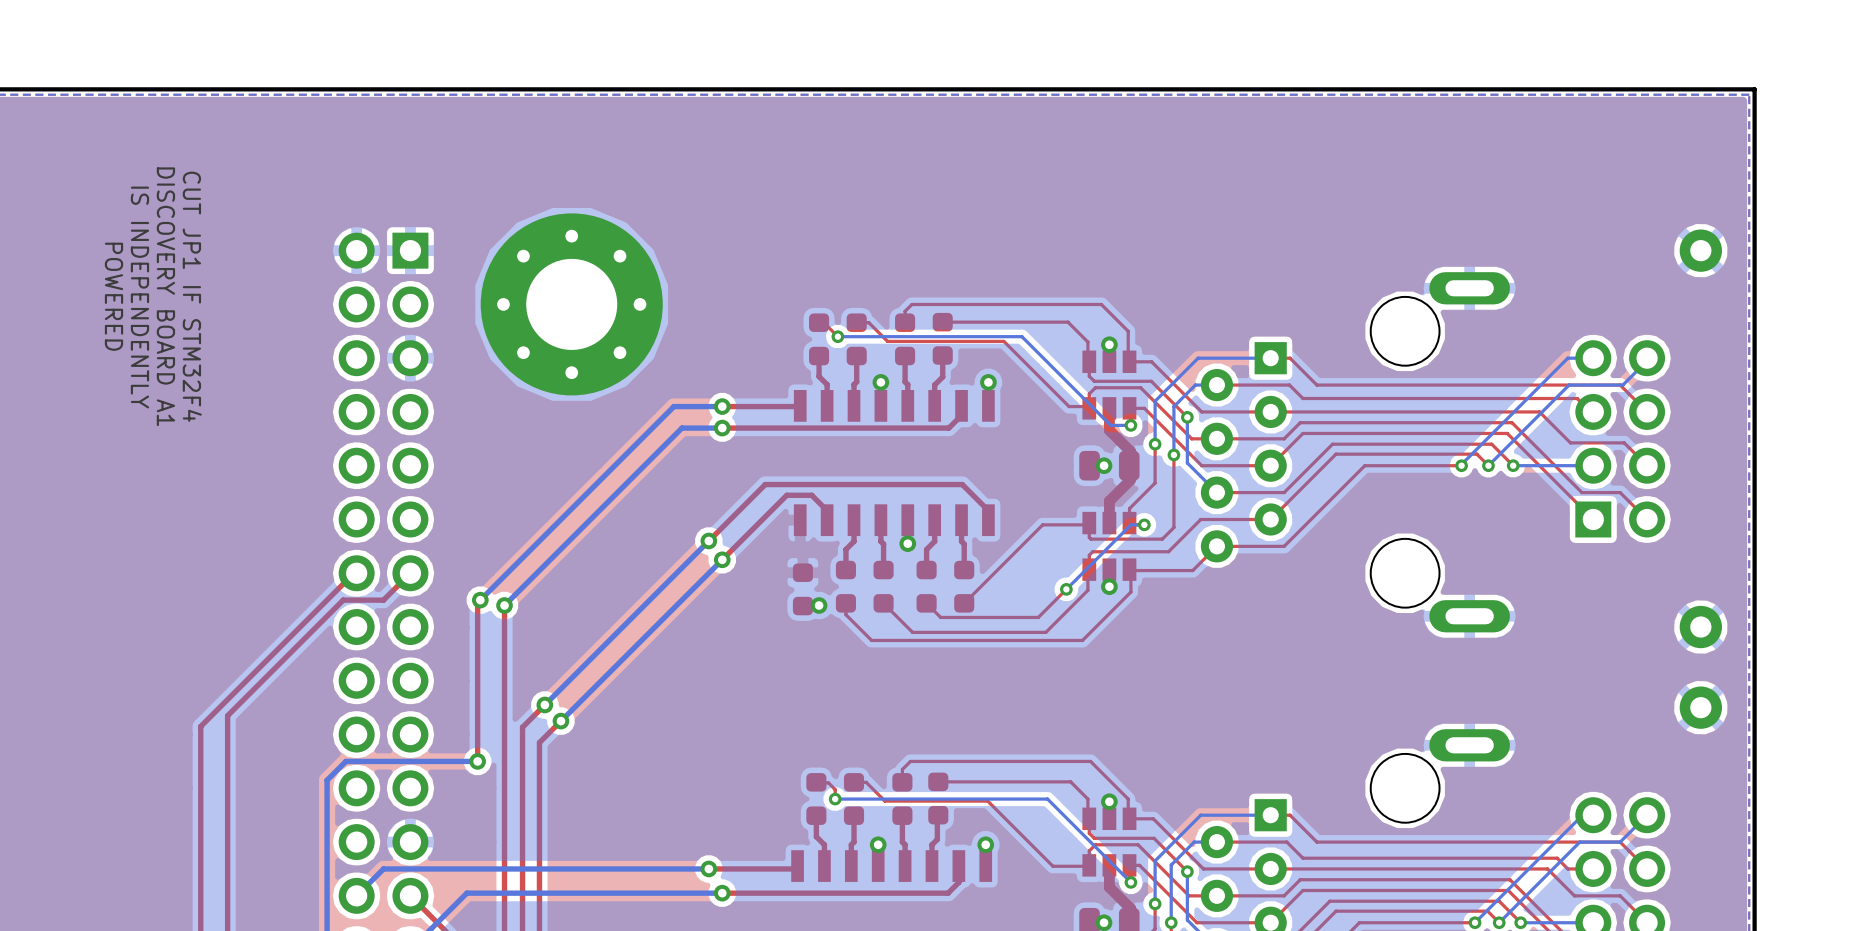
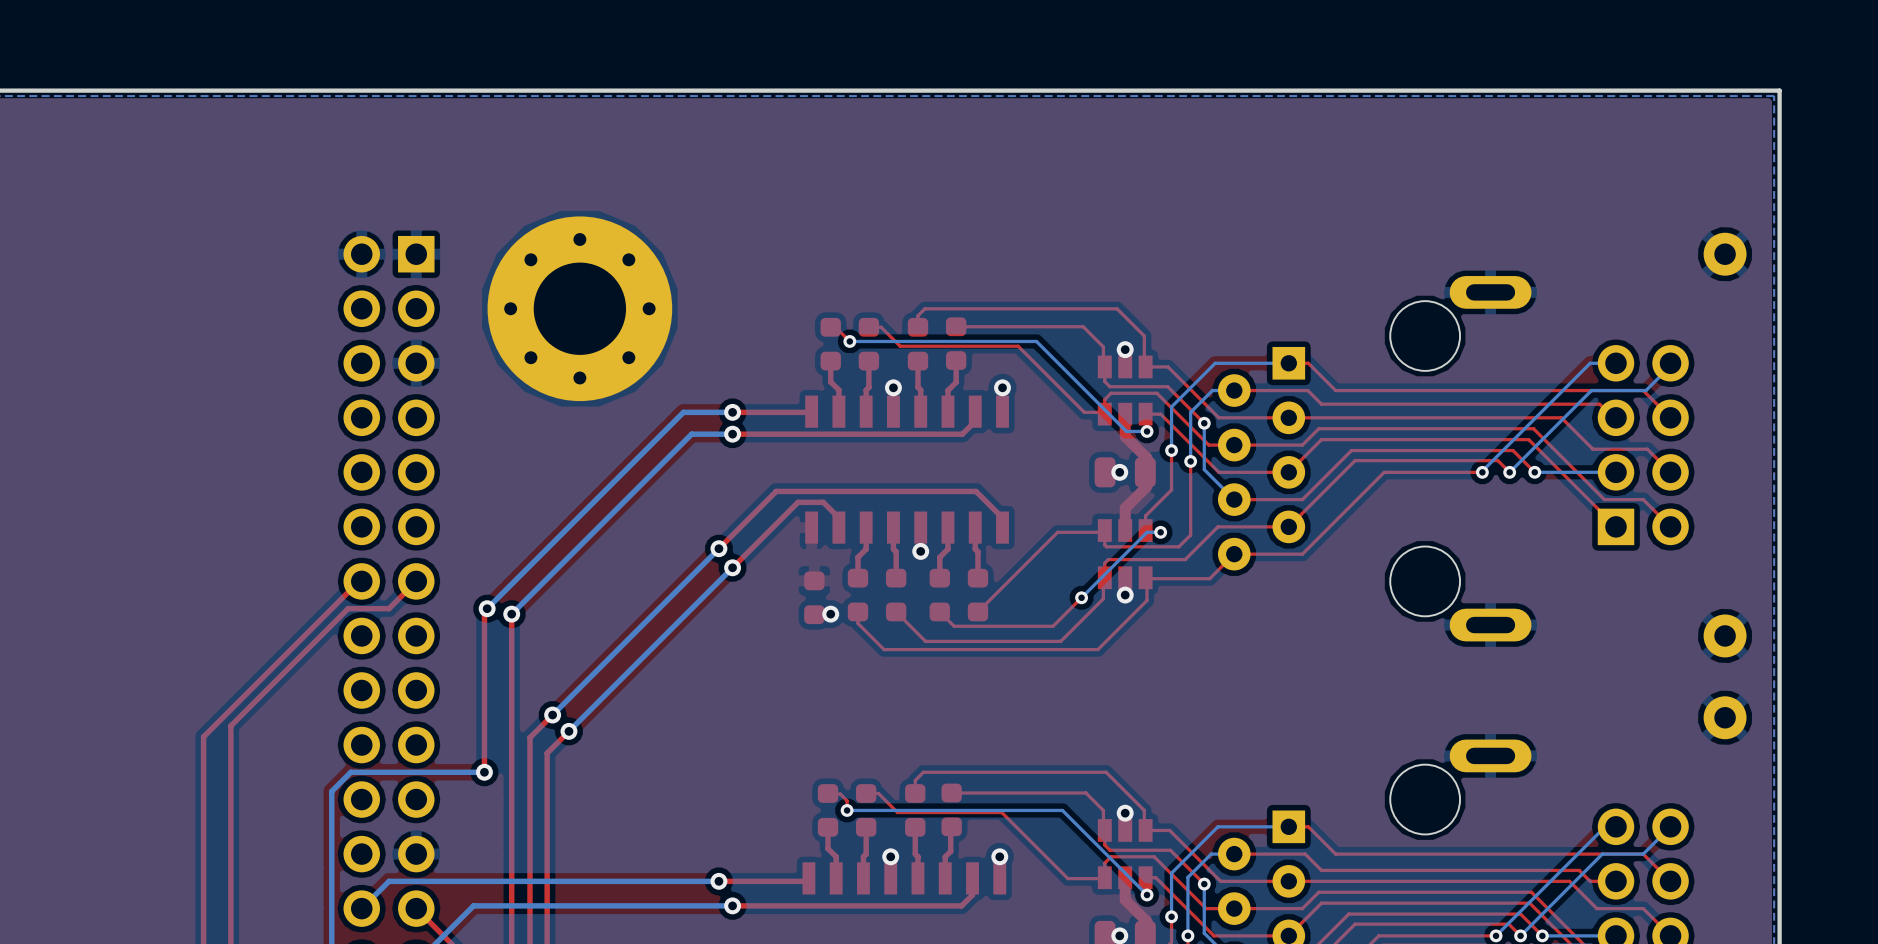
text: POWERED (114, 296) -> none
text: DISCOVERY BOARD A1 (165, 296) -> none
text: CUT JP1 IF STM32F4 (192, 296) -> none
text: IS INDEPENDENTLY (139, 297) -> none

